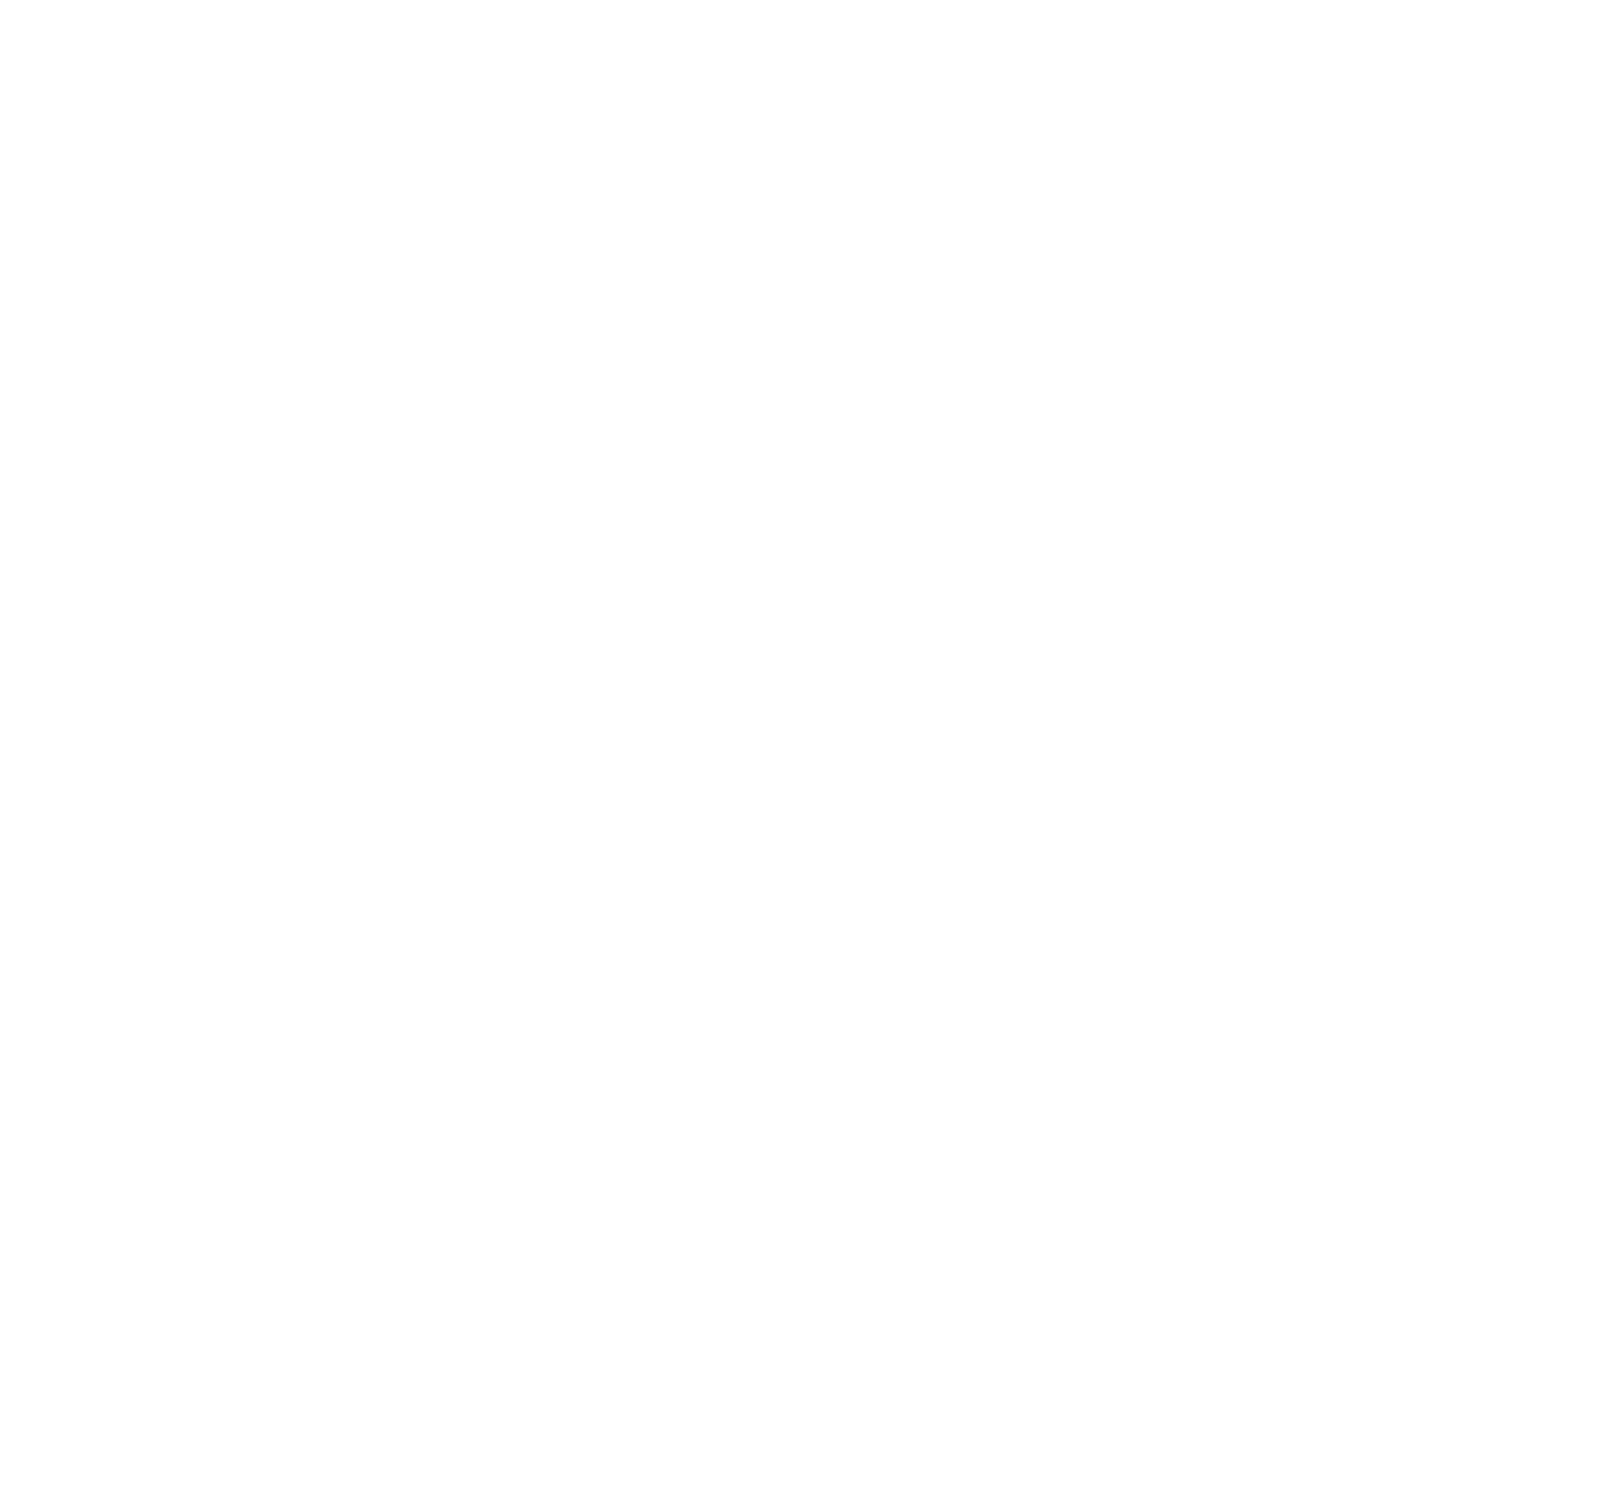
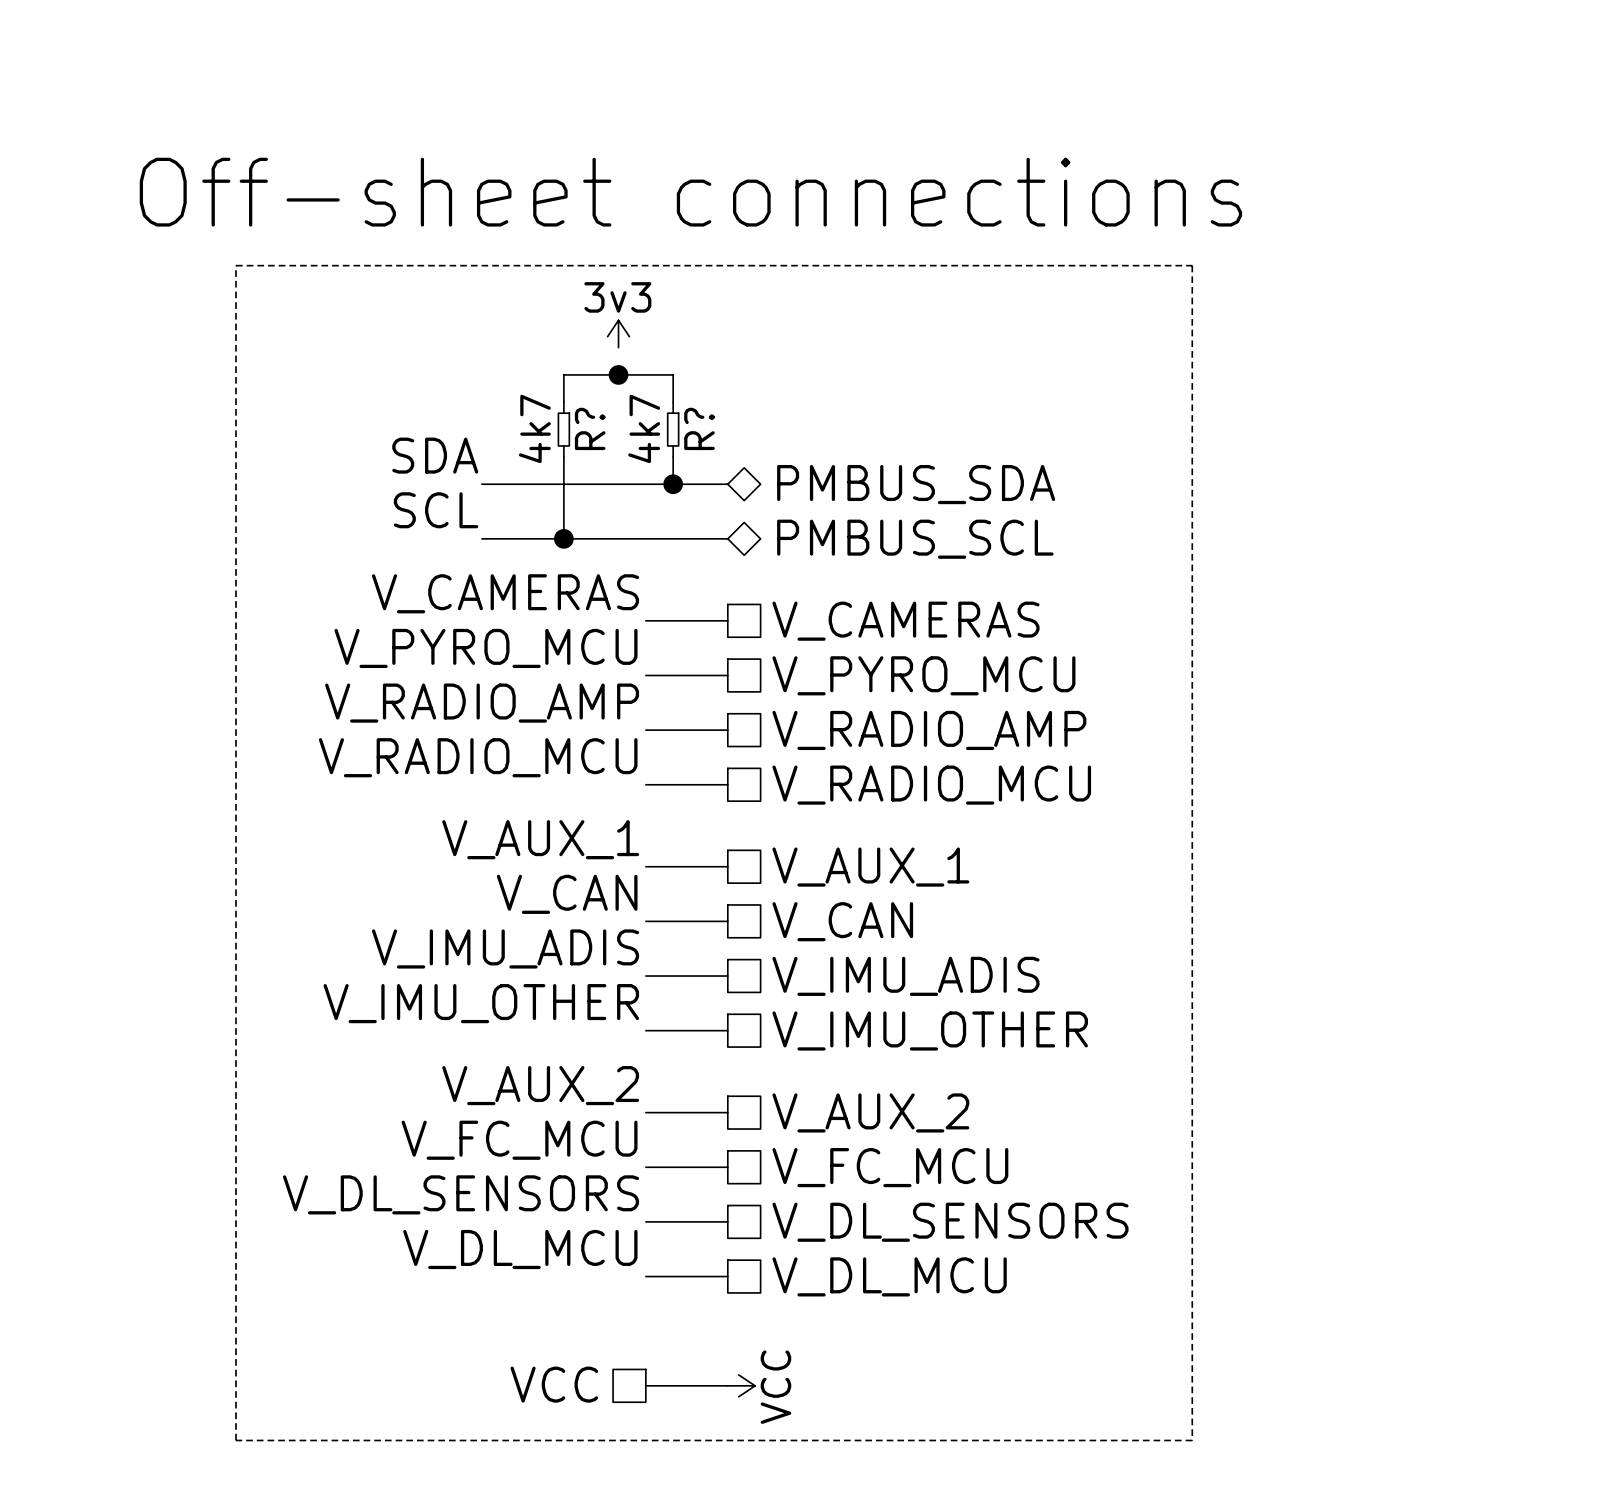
text: none -> Off-sheet connections (690, 192)
line: none -> (236, 265) (1192, 265) (1192, 1440) (236, 1440) (236, 265)
power symbol: none -> 3v3 (618, 333)
junction: none -> (618, 374)
wire: none -> (563, 402) (563, 374) (673, 374) (673, 402)
R?: none -> 4k7 (563, 429)
R?: none -> 4k7 (673, 429)
label: none -> SDA (435, 455)
wire: none -> (563, 456) (563, 538)
wire: none -> (673, 456) (673, 484)
wire: none -> (481, 484) (727, 484)
junction: none -> (673, 484)
hierarchical label: none -> PMBUS_SDA (916, 484)
label: none -> SCL (436, 510)
wire: none -> (481, 538) (727, 538)
junction: none -> (563, 538)
hierarchical label: none -> PMBUS_SCL (915, 539)
label: none -> V_CAMERAS (505, 593)
wire: none -> (645, 620) (727, 620)
hierarchical label: none -> V_CAMERAS (905, 621)
label: none -> V_PYRO_MCU (486, 648)
wire: none -> (645, 675) (727, 675)
hierarchical label: none -> V_PYRO_MCU (923, 675)
label: none -> V_RADIO_AMP (482, 703)
wire: none -> (645, 730) (727, 730)
hierarchical label: none -> V_RADIO_AMP (929, 730)
label: none -> V_RADIO_MCU (478, 757)
wire: none -> (645, 784) (727, 784)
hierarchical label: none -> V_RADIO_MCU (931, 785)
label: none -> V_AUX_1 (540, 839)
wire: none -> (645, 866) (727, 866)
hierarchical label: none -> V_AUX_1 (870, 867)
label: none -> V_CAN (567, 894)
wire: none -> (645, 921) (727, 921)
hierarchical label: none -> V_CAN (842, 921)
label: none -> V_IMU_ADIS (505, 948)
wire: none -> (645, 976) (727, 976)
hierarchical label: none -> V_IMU_ADIS (905, 976)
label: none -> V_IMU_OTHER (481, 1003)
wire: none -> (645, 1030) (727, 1030)
hierarchical label: none -> V_IMU_OTHER (930, 1031)
label: none -> V_AUX_2 (540, 1085)
wire: none -> (645, 1112) (727, 1112)
hierarchical label: none -> V_AUX_2 (870, 1112)
label: none -> V_FC_MCU (519, 1140)
wire: none -> (645, 1167) (727, 1167)
hierarchical label: none -> V_FC_MCU (890, 1167)
label: none -> V_DL_SENSORS (461, 1194)
wire: none -> (645, 1221) (727, 1221)
hierarchical label: none -> V_DL_SENSORS (950, 1222)
label: none -> V_DL_MCU (520, 1249)
wire: none -> (645, 1276) (727, 1276)
hierarchical label: none -> V_DL_MCU (889, 1276)
hierarchical label: none -> VCC (554, 1384)
wire: none -> (645, 1385) (727, 1385)
power symbol: none -> VCC (741, 1385)

